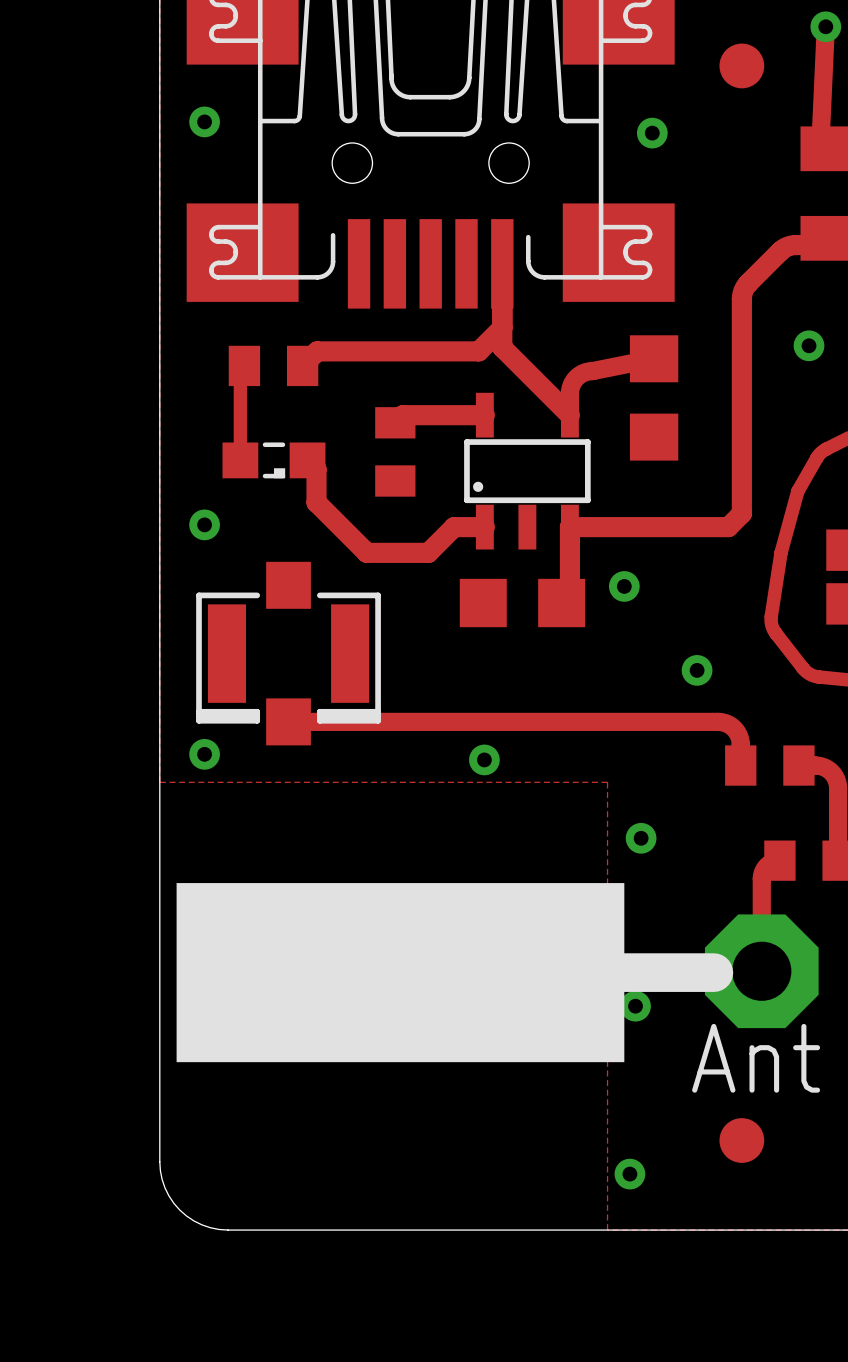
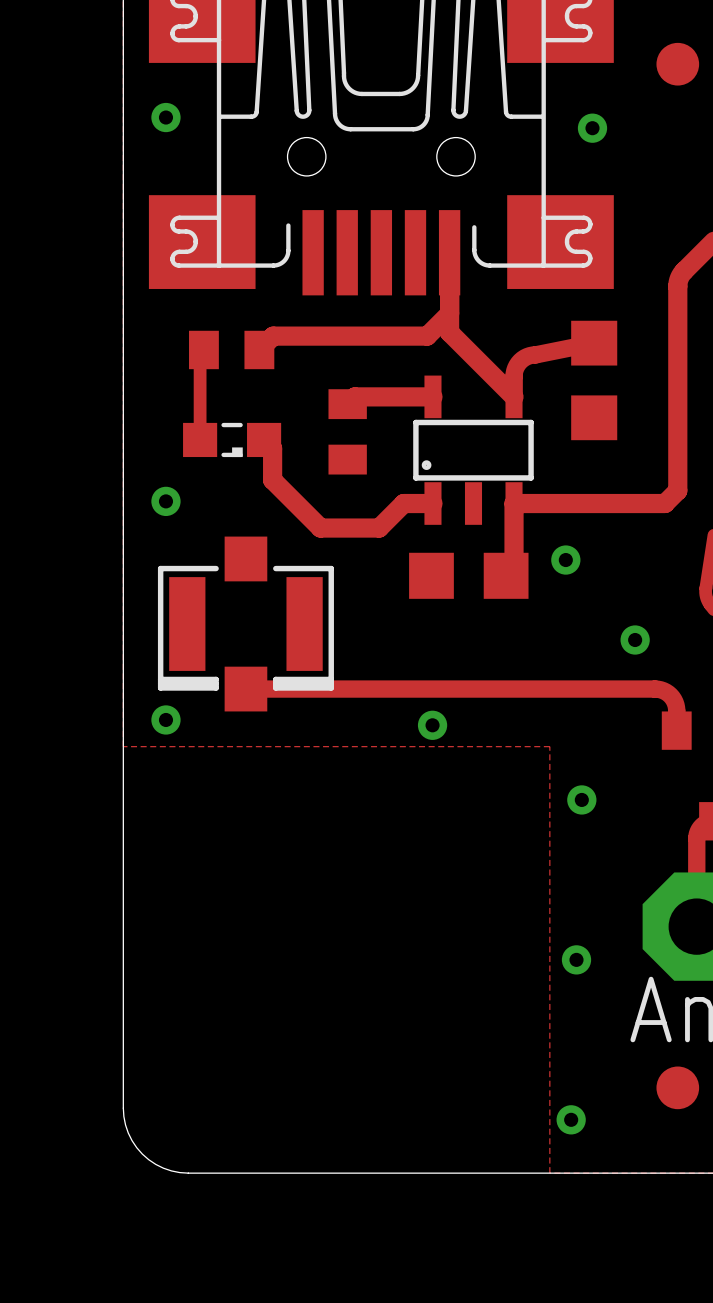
drawing: [176, 883, 625, 1063] -> none
line: (624, 972) (713, 972) -> none

